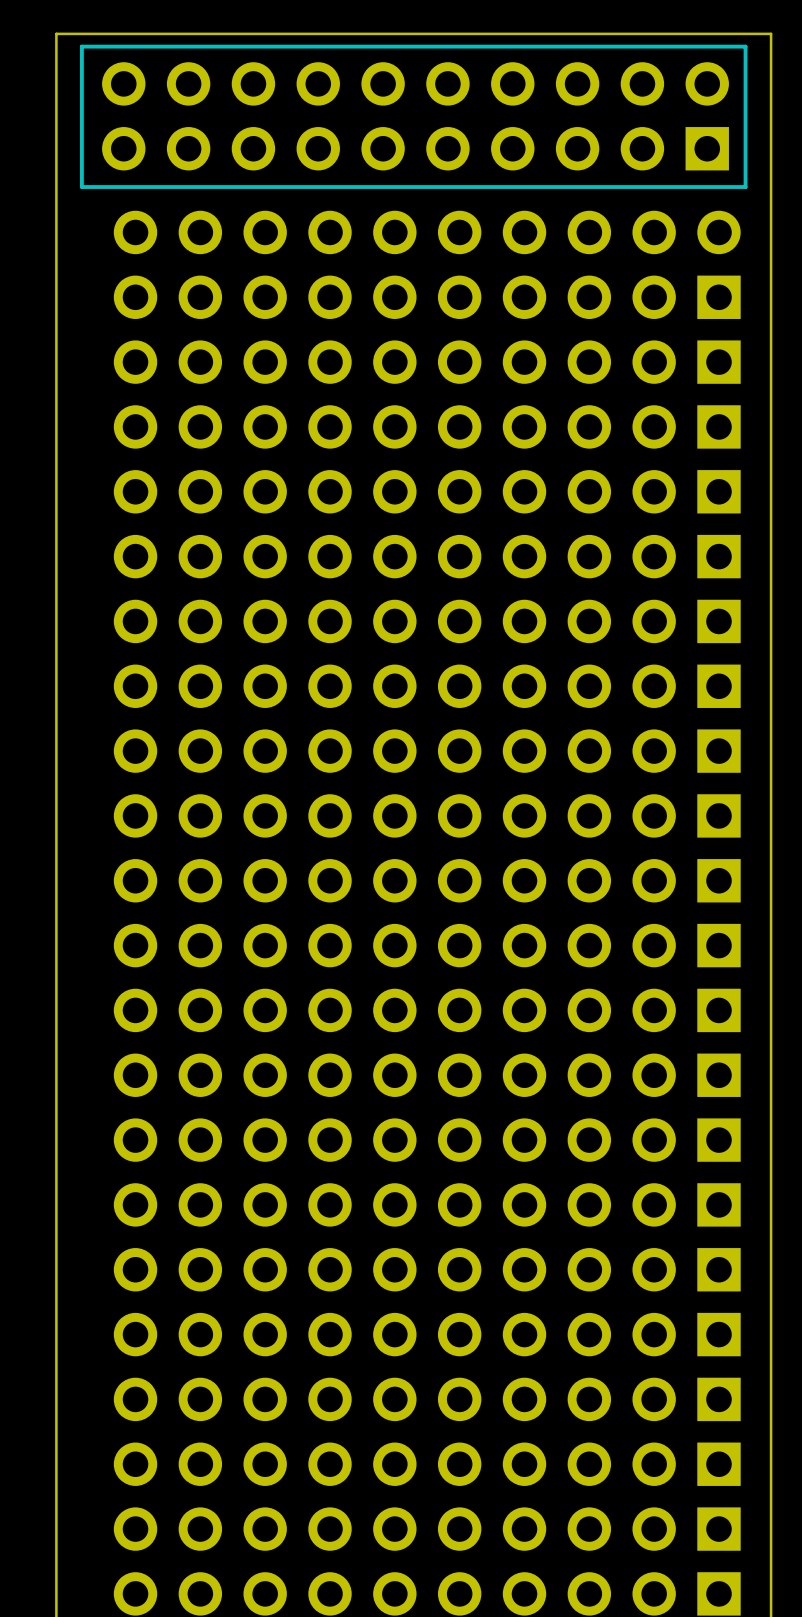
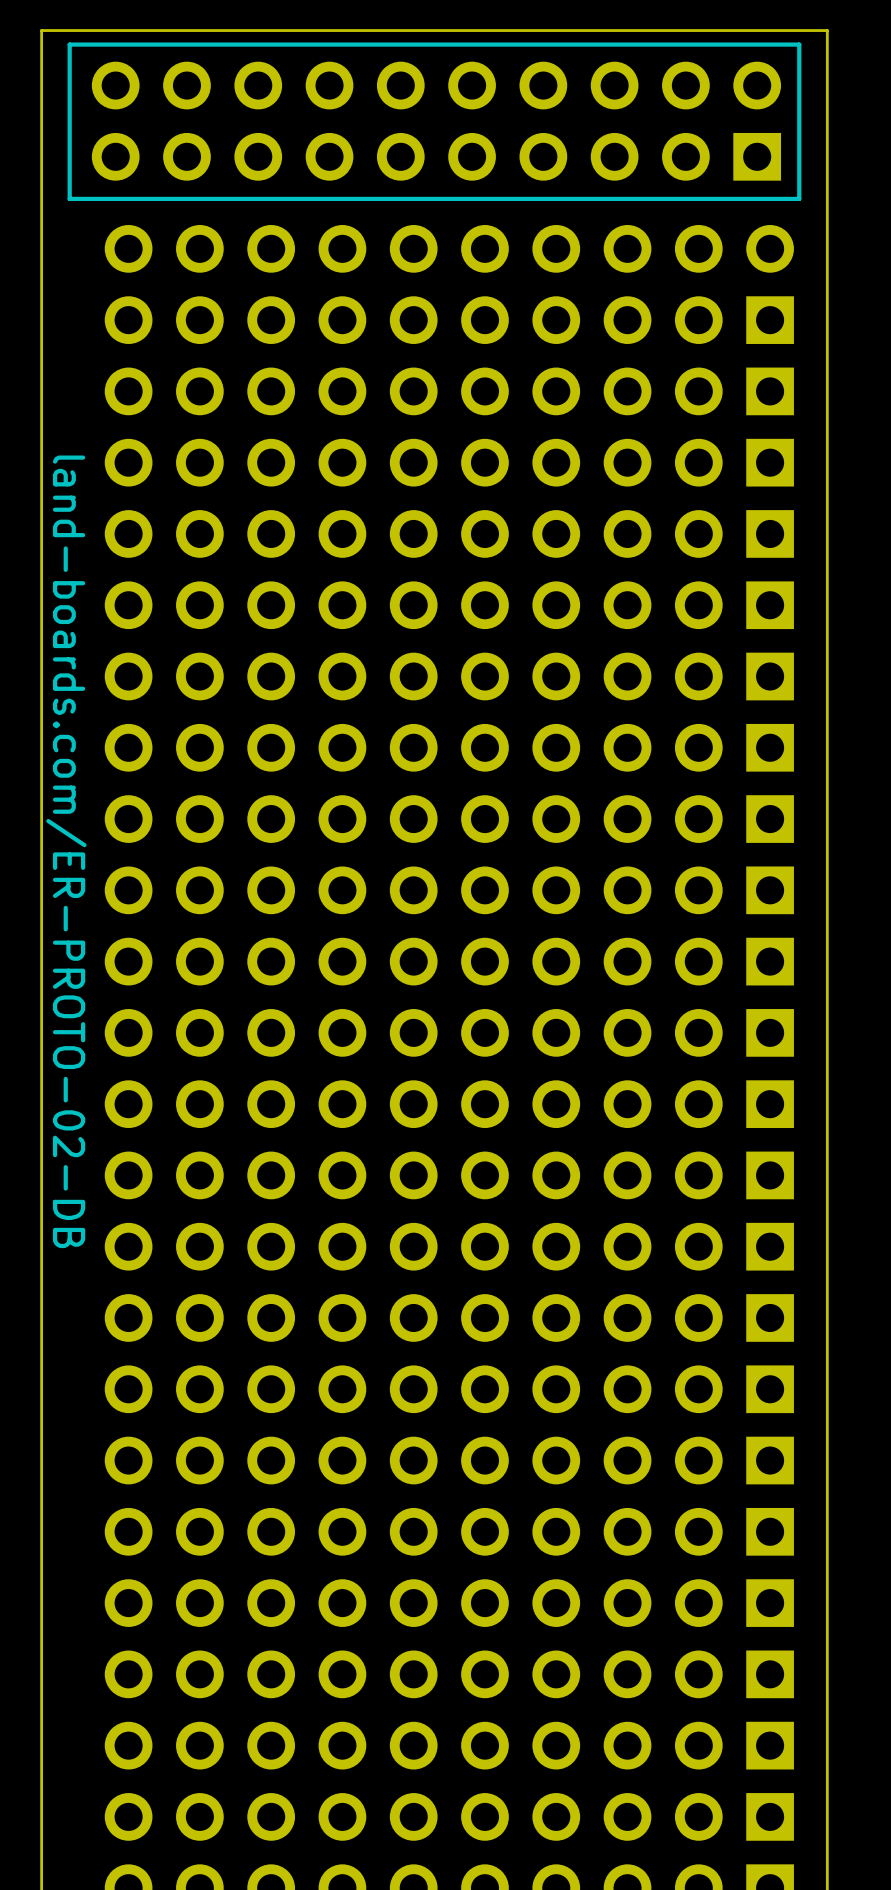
text: none -> land-boards.com/ER-PROTO-02-DB (66, 851)

